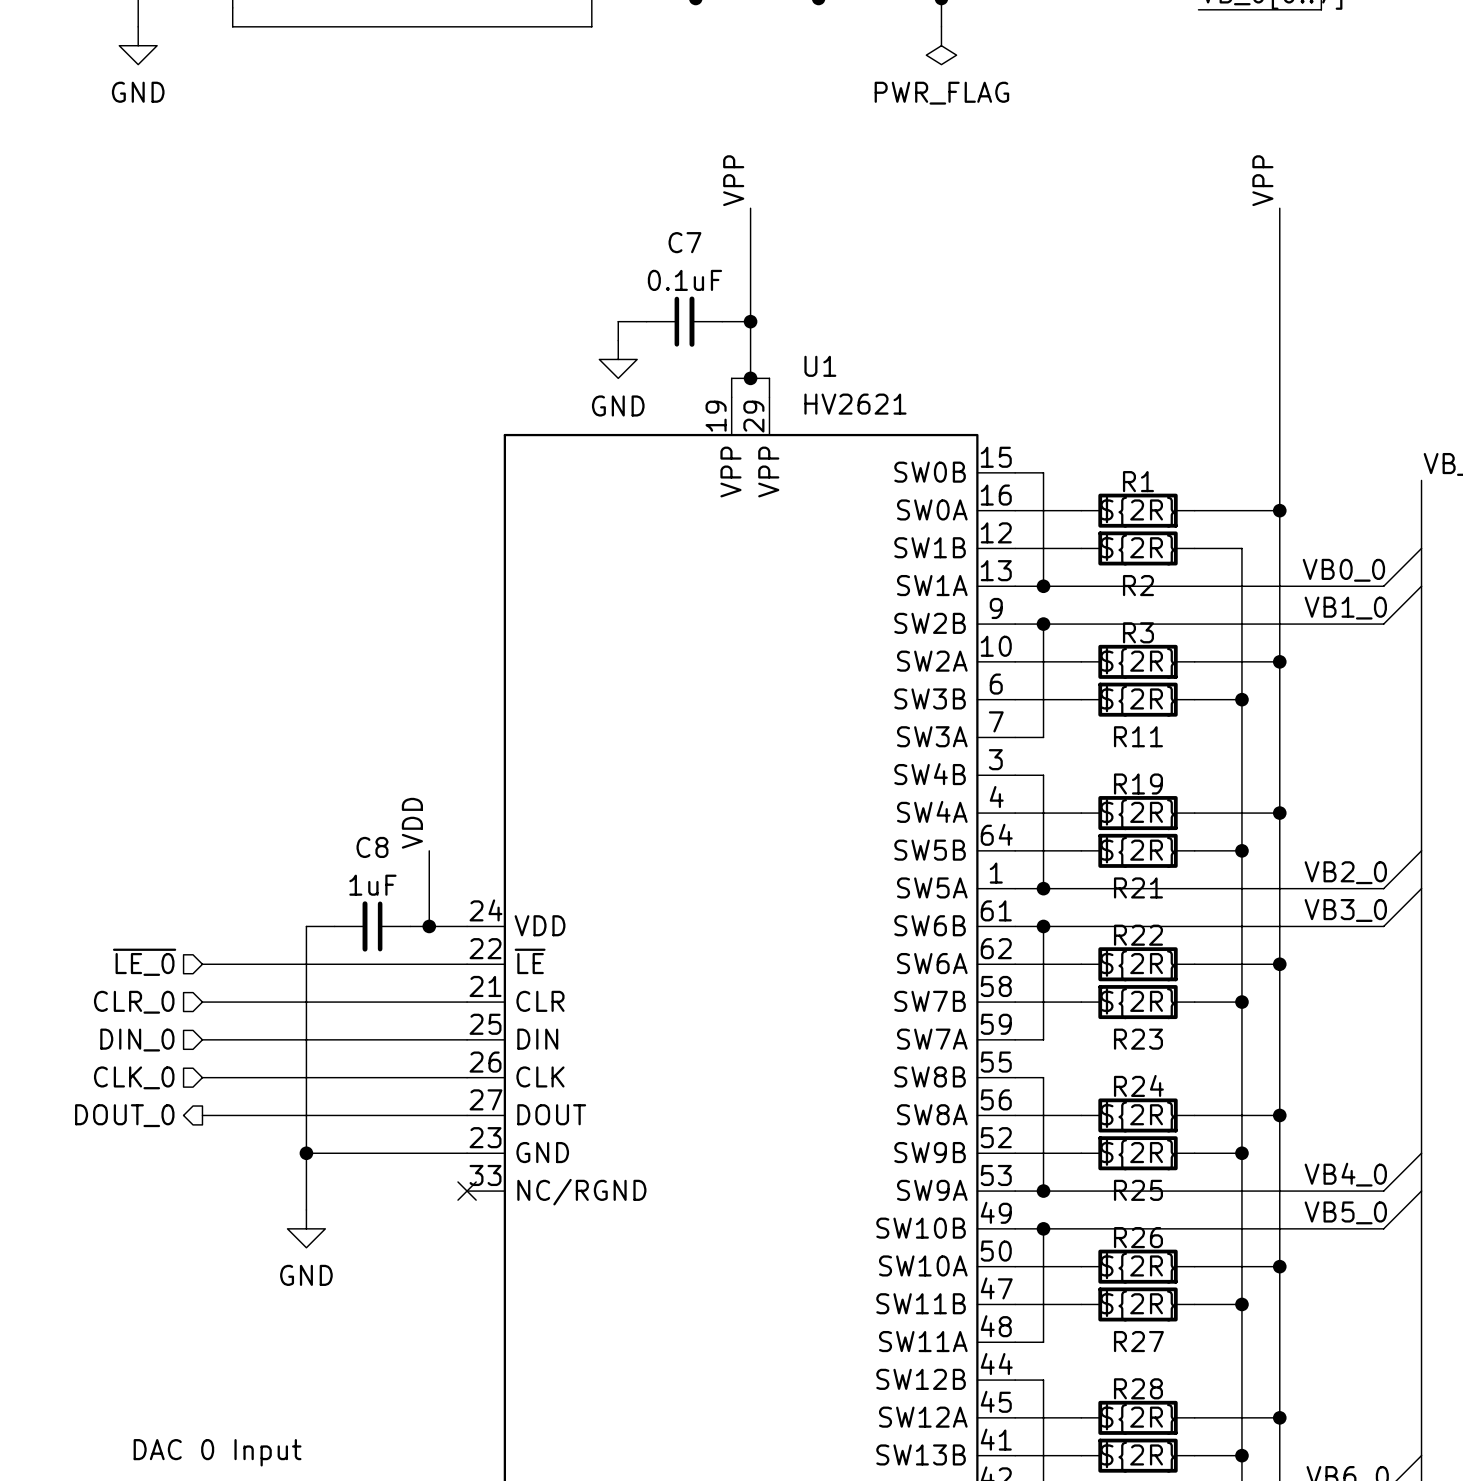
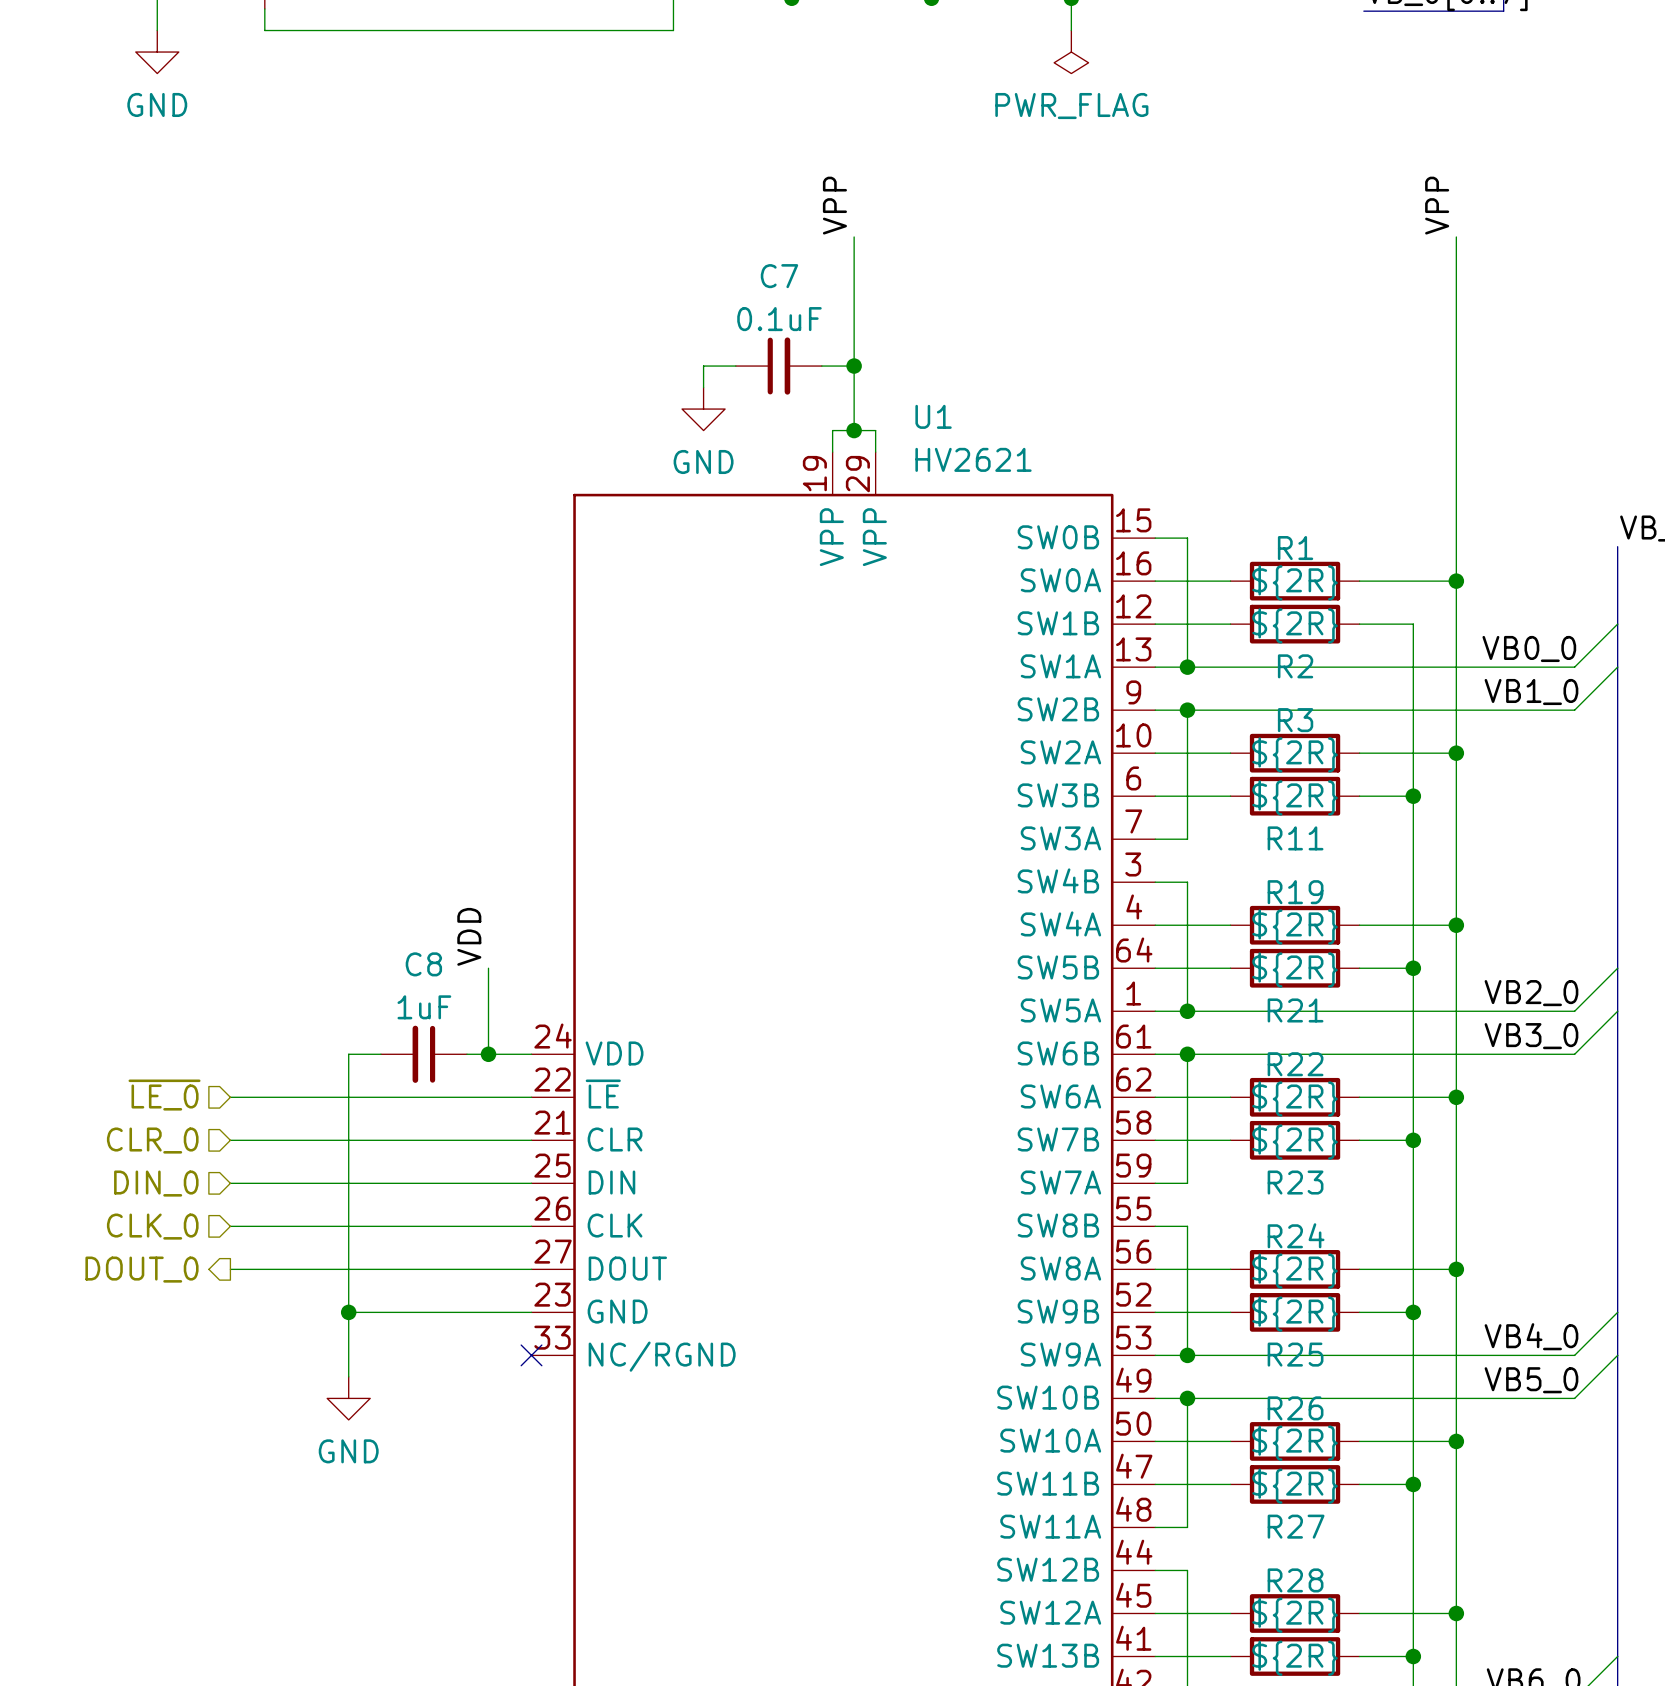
text: DAC 0 Input (217, 1452) -> none

